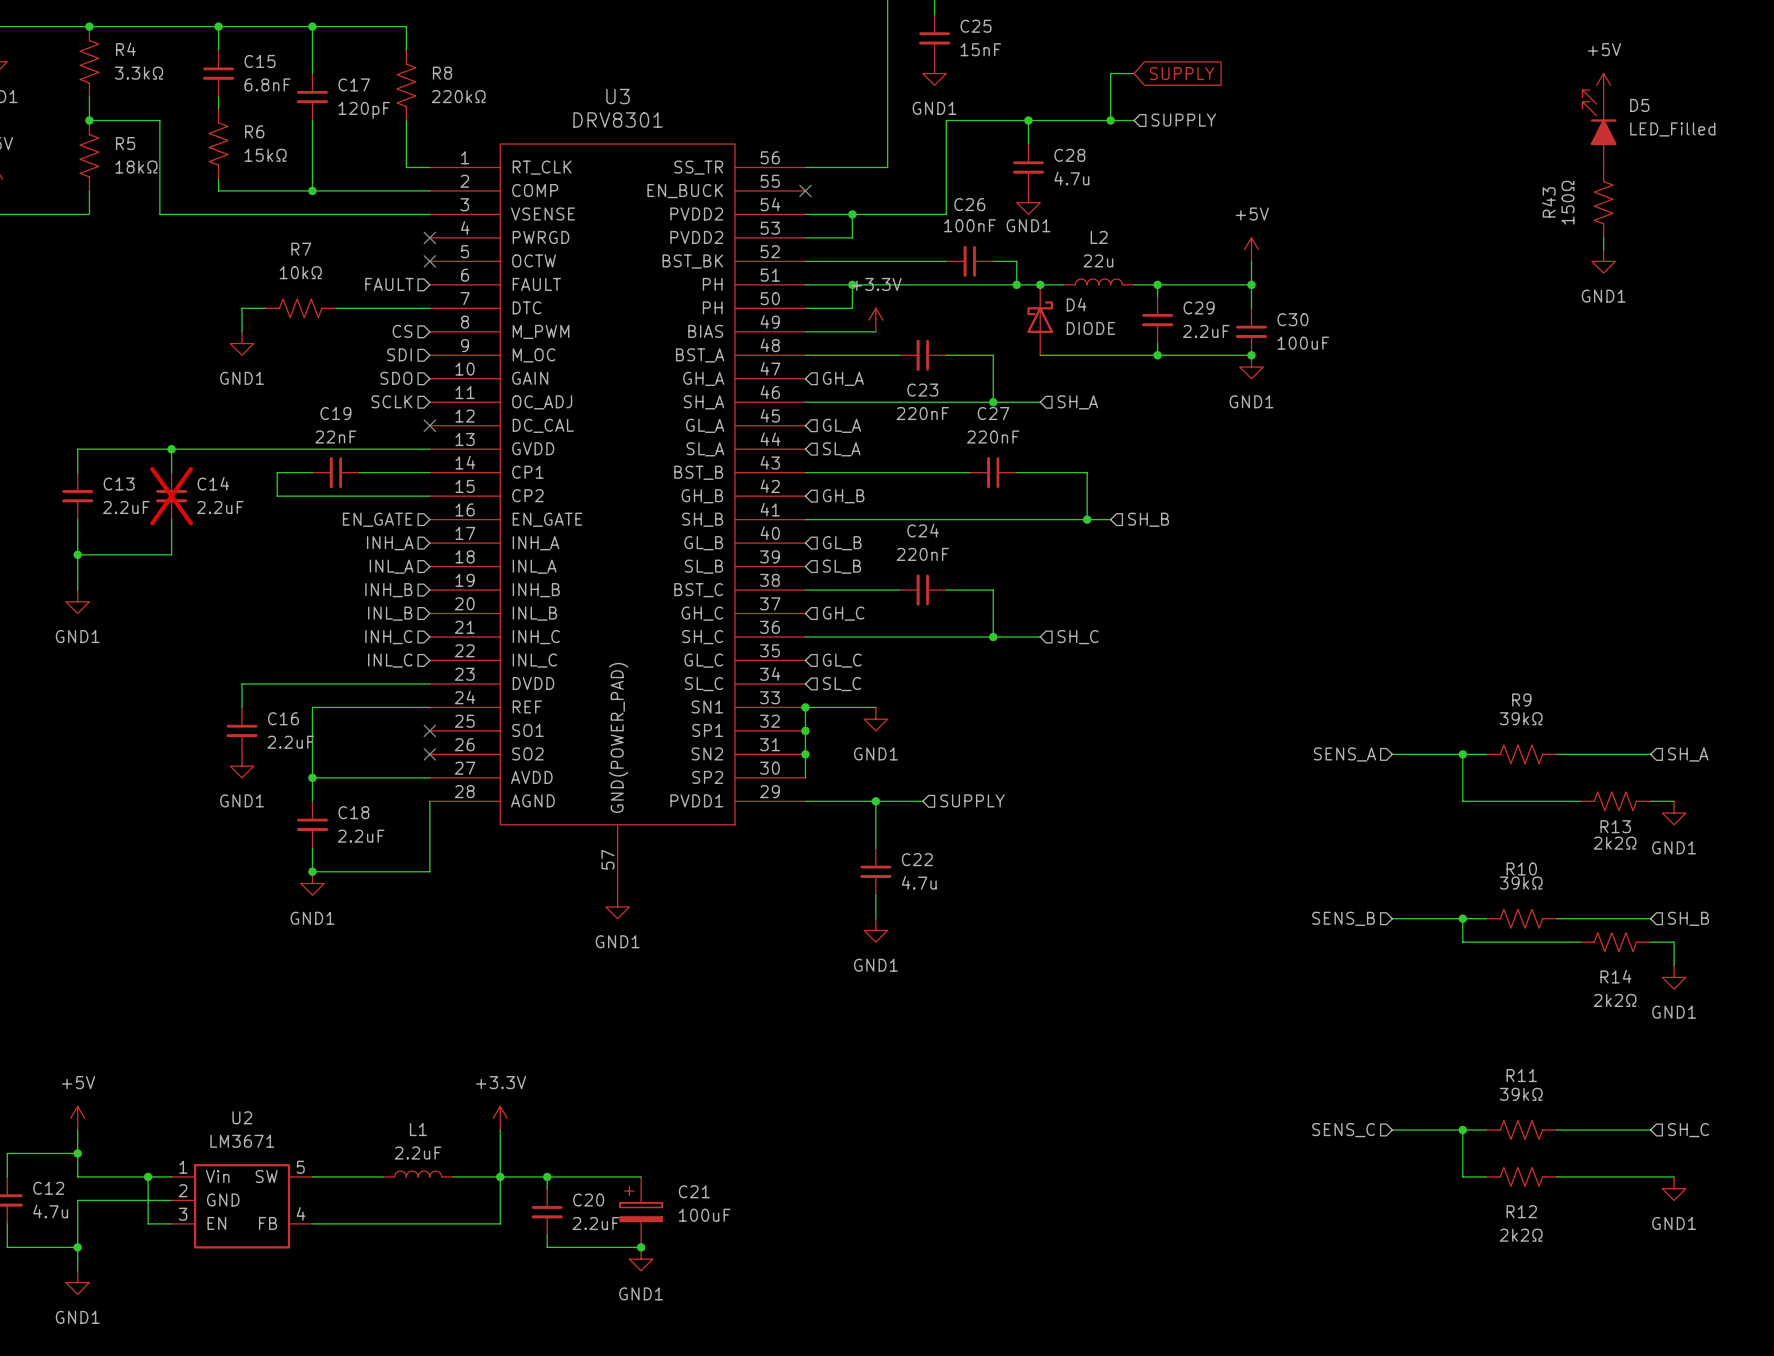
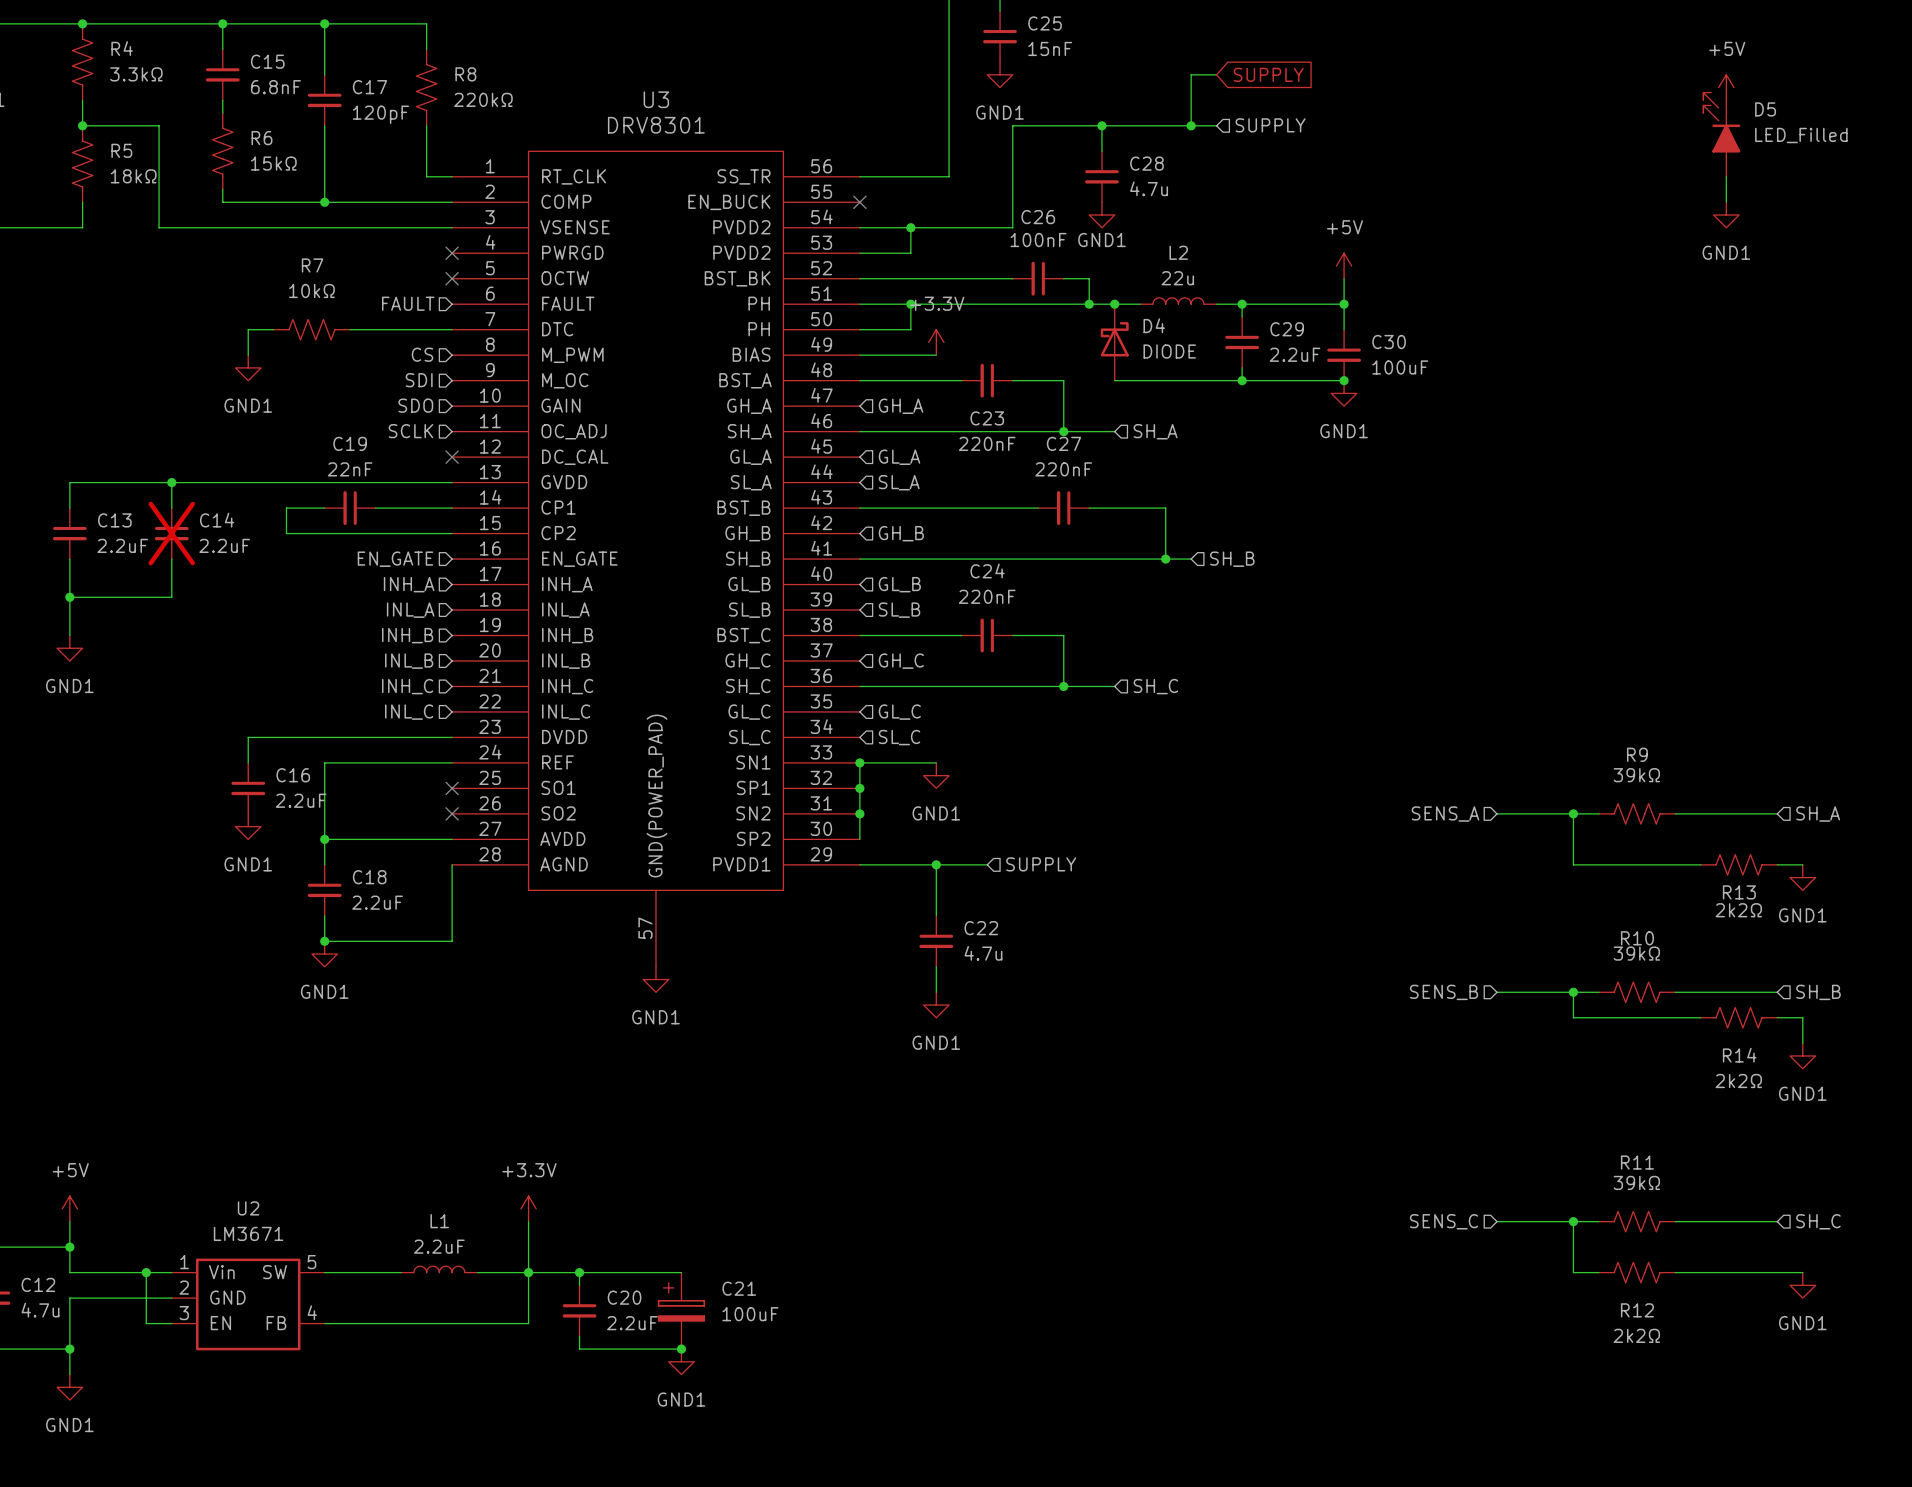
R43: 150Ω (1603, 202) -> none
wire: (1603, 237) (1603, 249) -> none
power symbol position: GND1 (1603, 261) -> GND1 (1726, 215)

